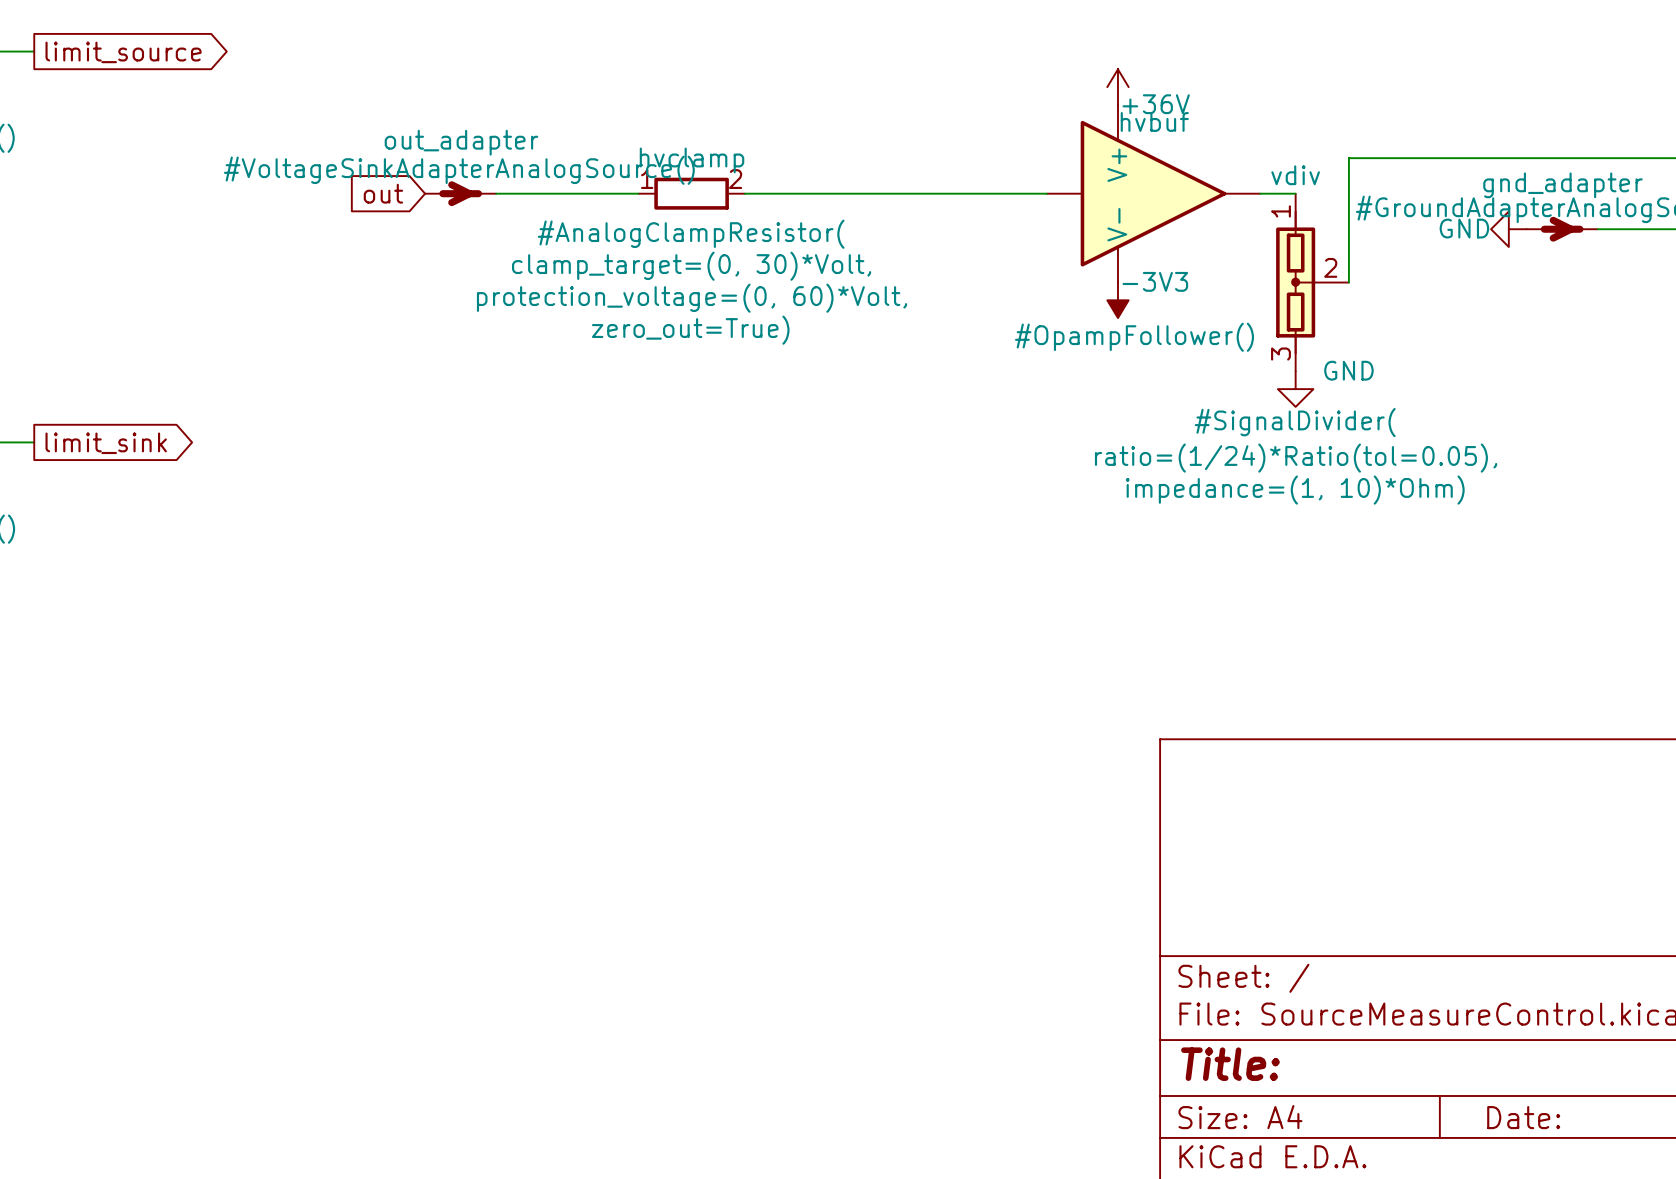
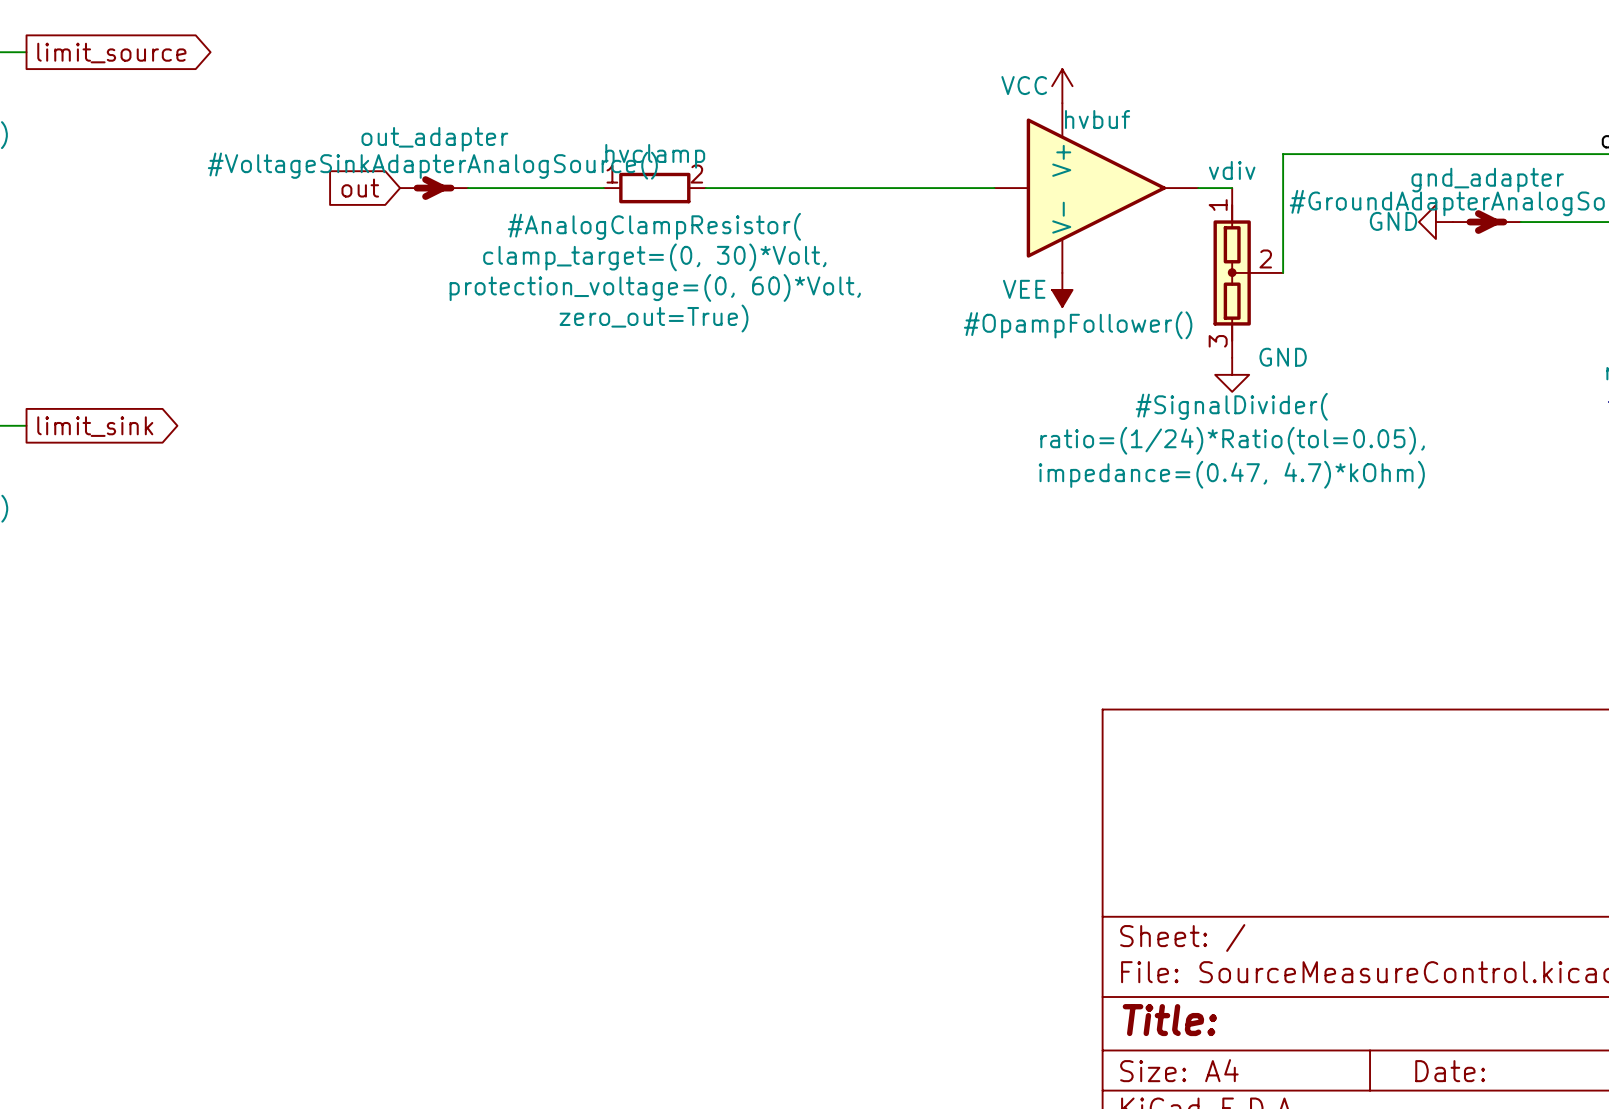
power symbol: +36V (1117, 87) -> VCC (1062, 86)
power symbol: -3V3 (1117, 300) -> VEE (1062, 289)
vdiv text: impedance=(1, 10)*Ohm) (1295, 490) -> impedance=(0.47, 4.7)*kOhm) (1231, 474)

